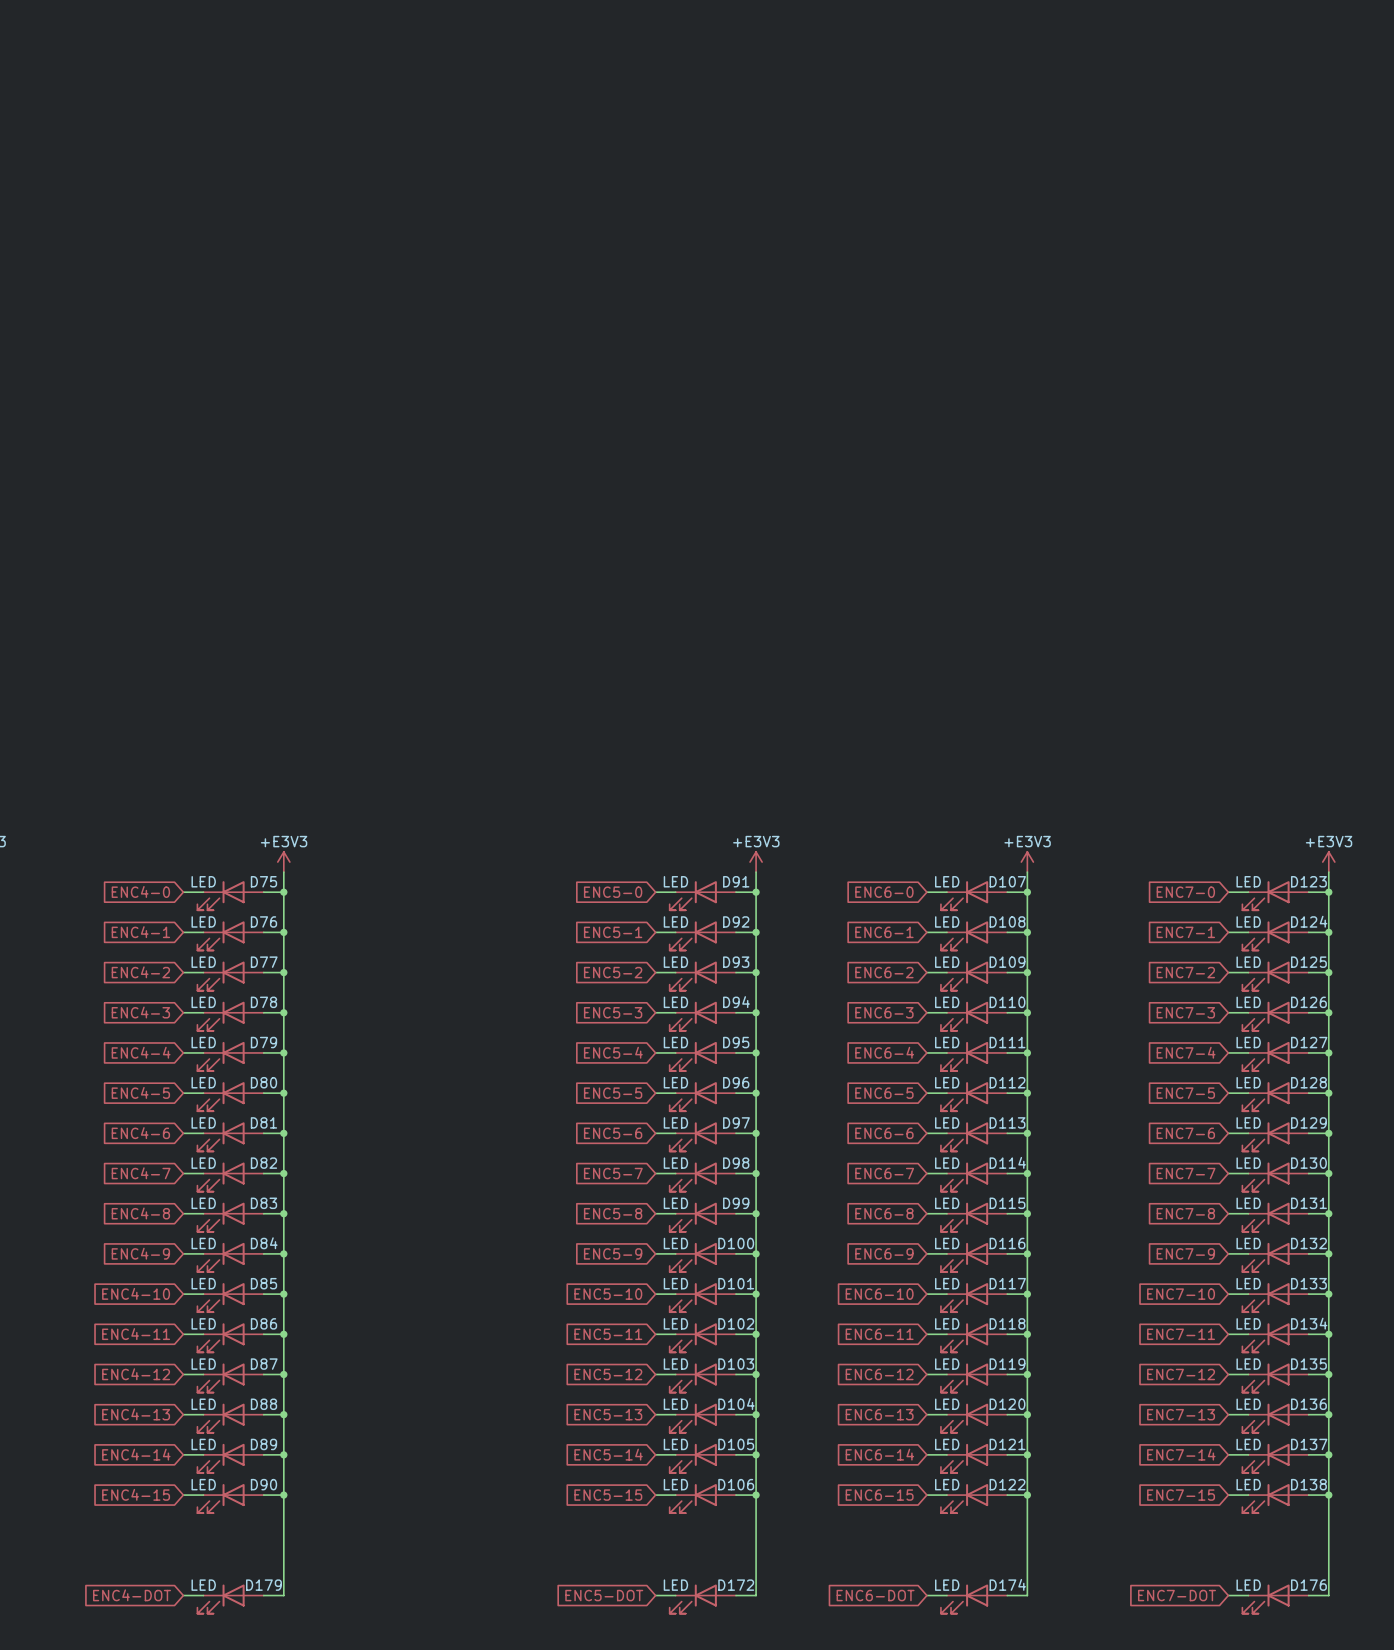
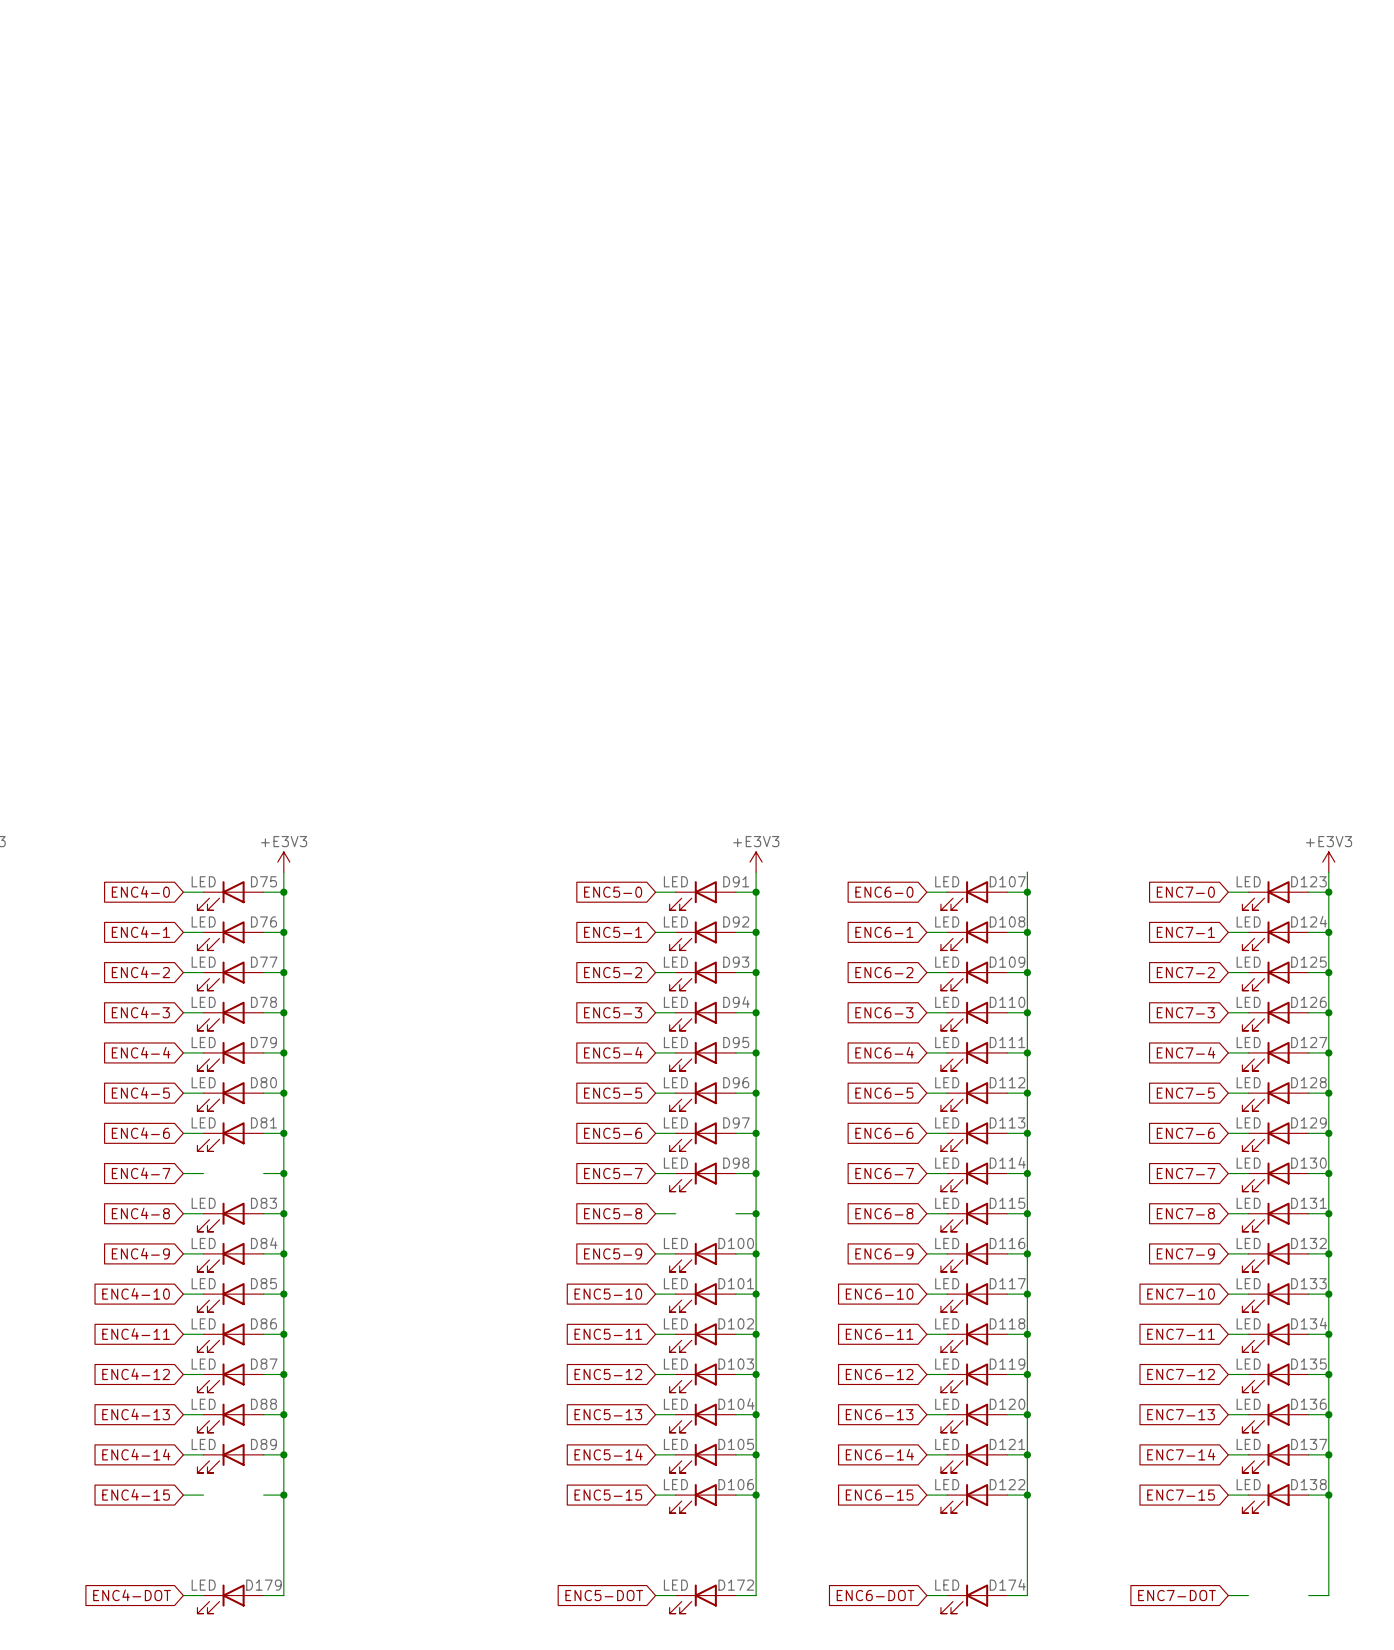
power symbol: +E3V3 (1027, 862) -> none
D82: LED (230, 1177) -> none
D99: LED (702, 1217) -> none
D90: LED (230, 1498) -> none
D176: LED (1275, 1599) -> none

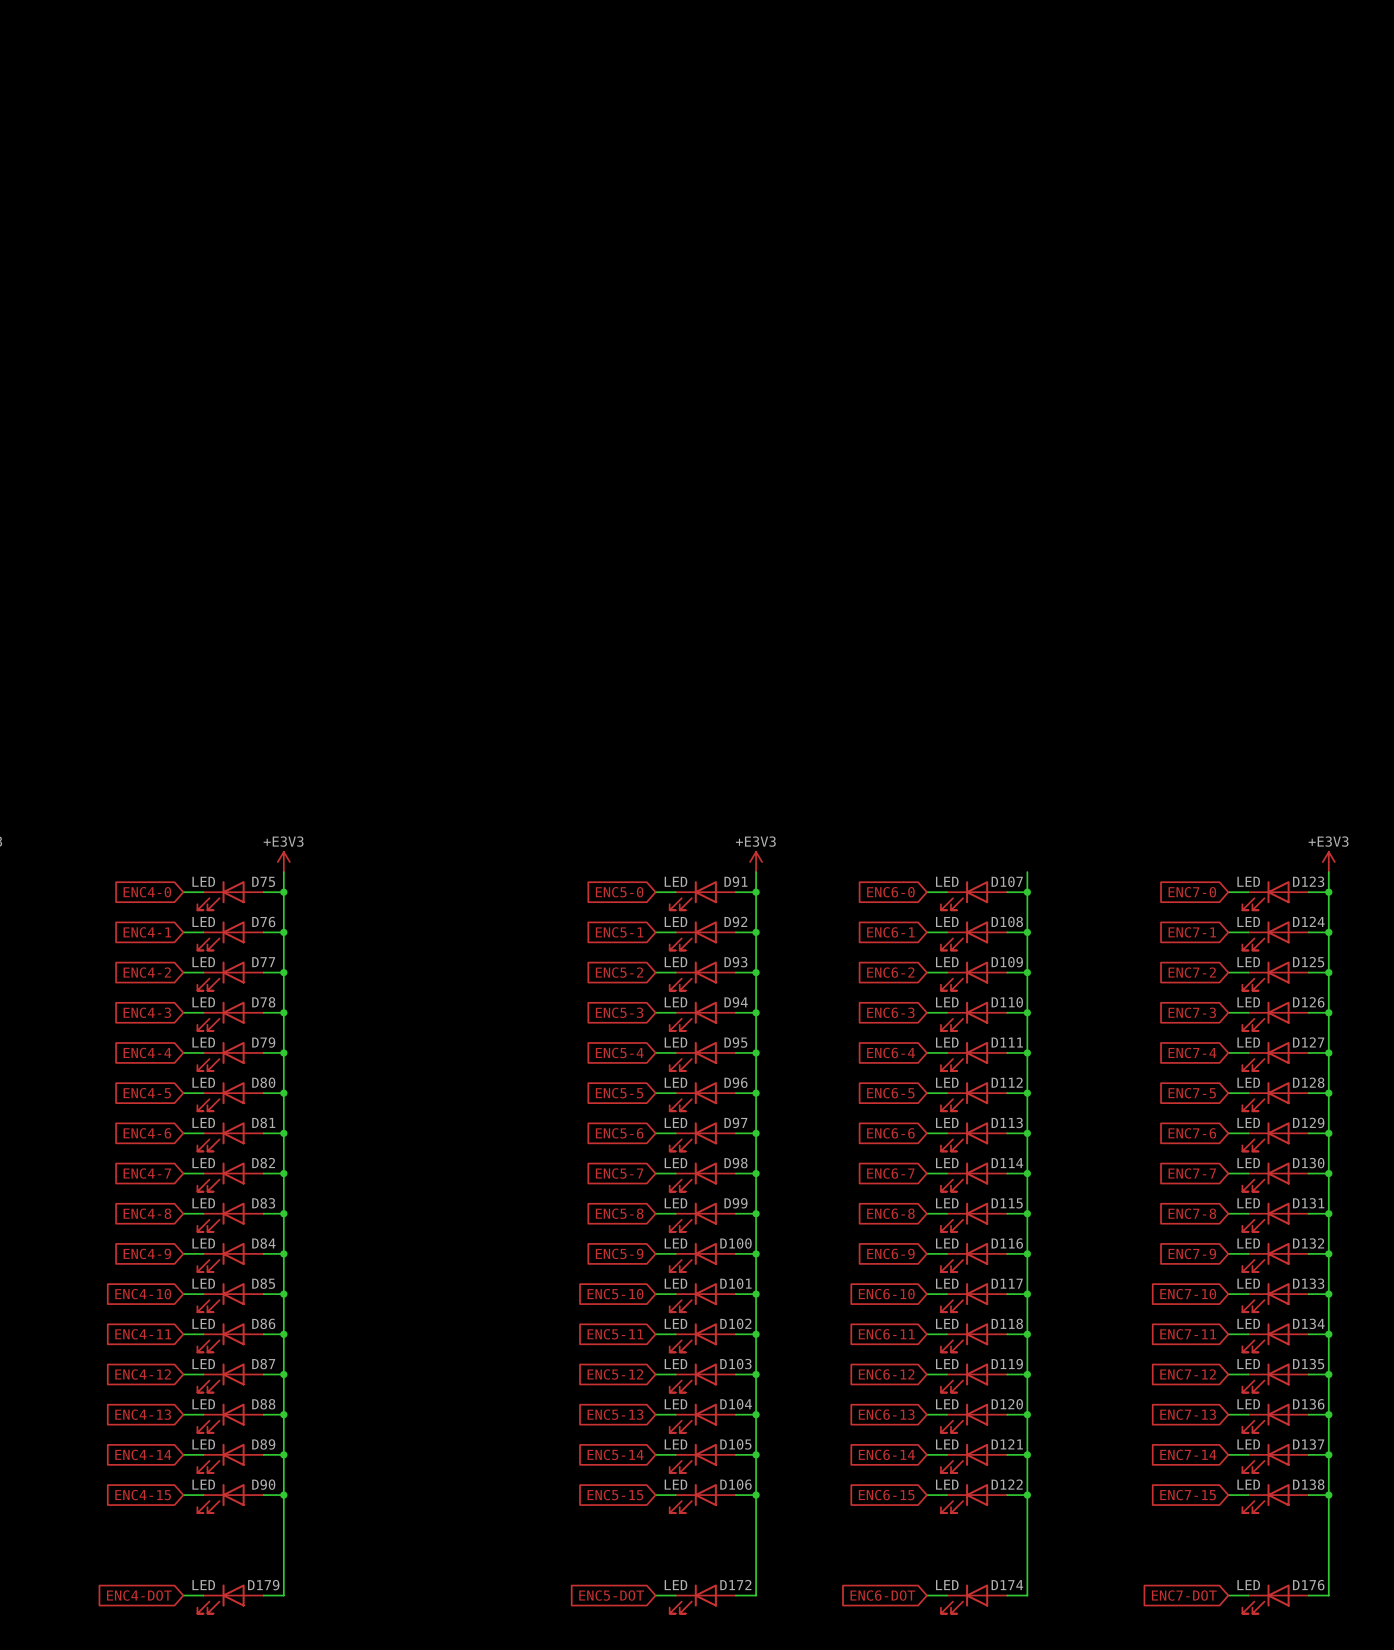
D82: none -> LED (230, 1177)
D99: none -> LED (702, 1217)
D90: none -> LED (230, 1498)
D176: none -> LED (1275, 1599)

